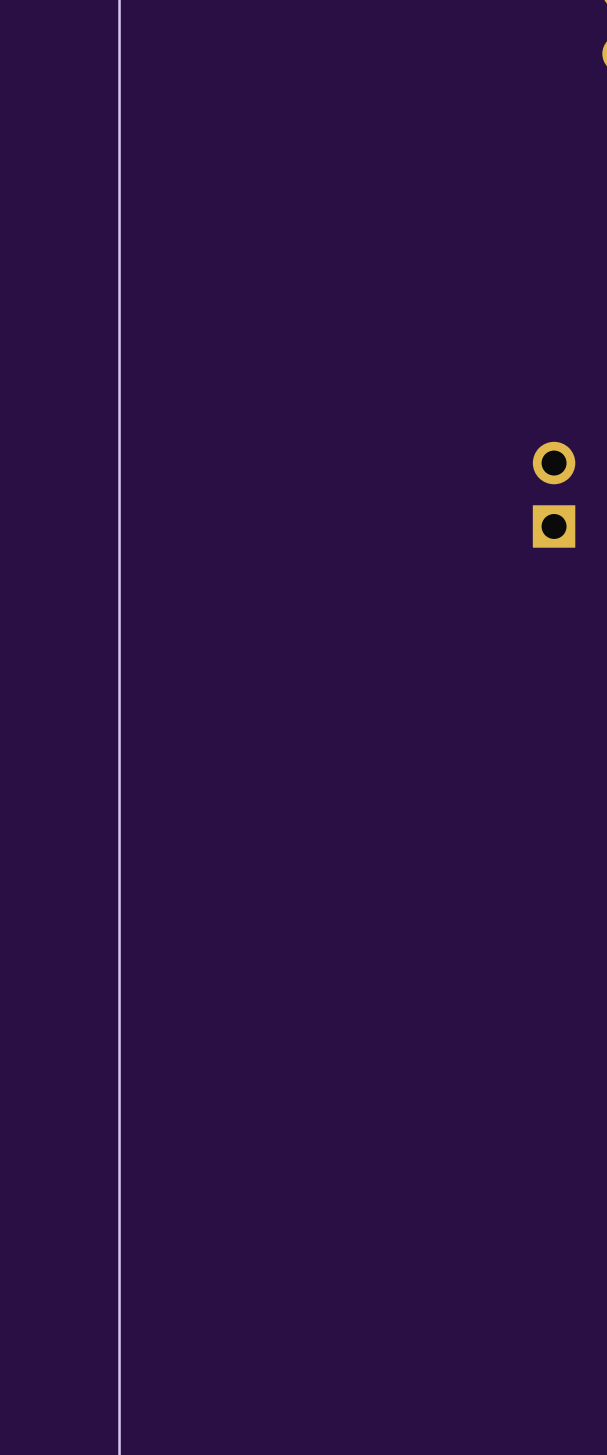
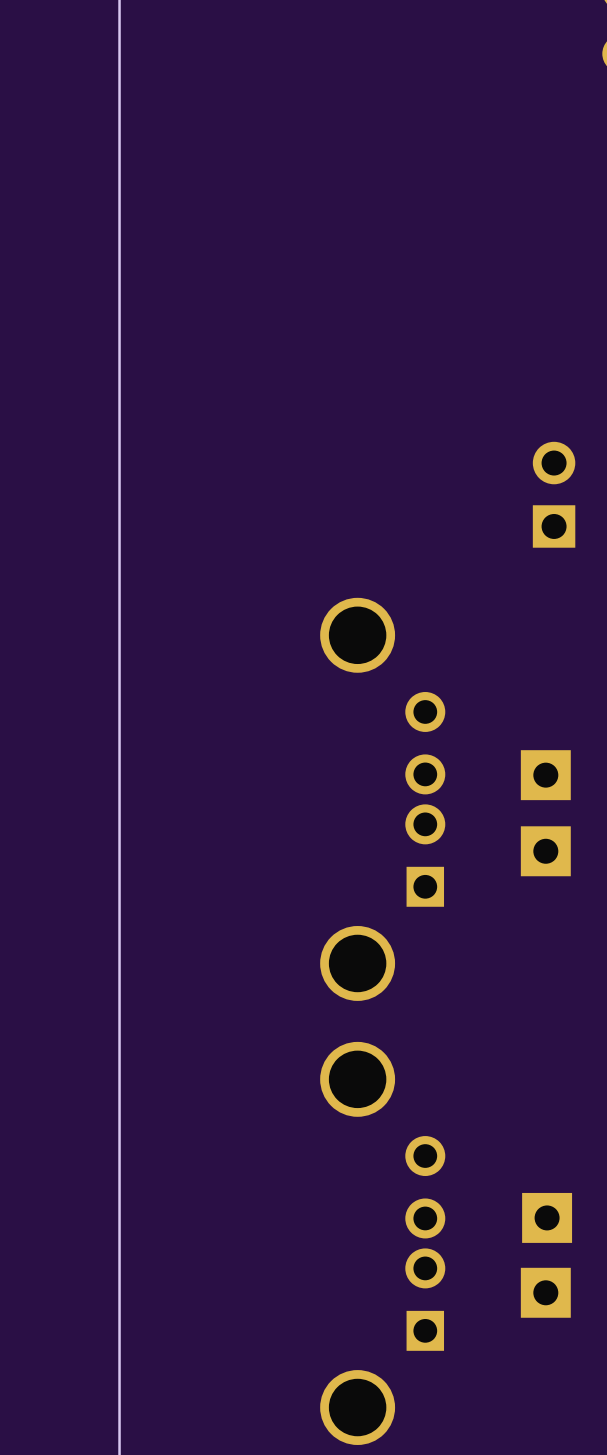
part: none -> (545, 775)
part: none -> (382, 799)
part: none -> (545, 851)
part: none -> (547, 1217)
part: none -> (382, 1243)
part: none -> (545, 1292)

